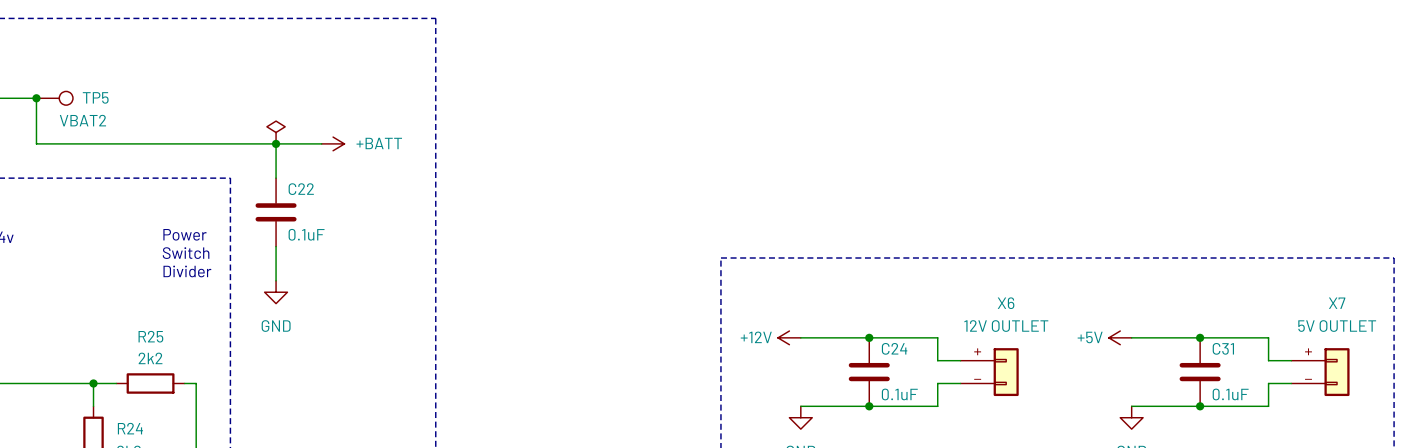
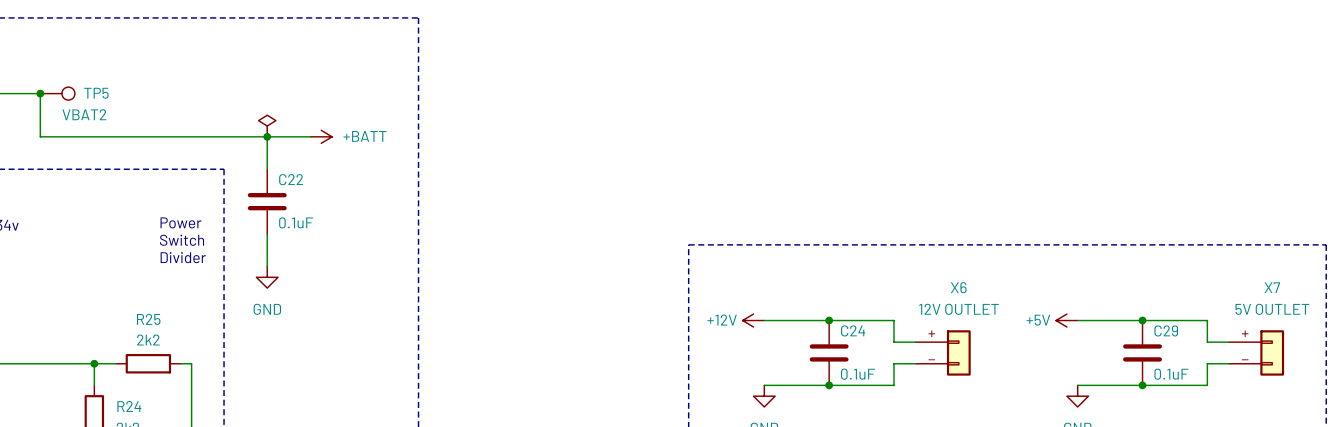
C31 name: C31 (1223, 348) -> C29 (1166, 330)

